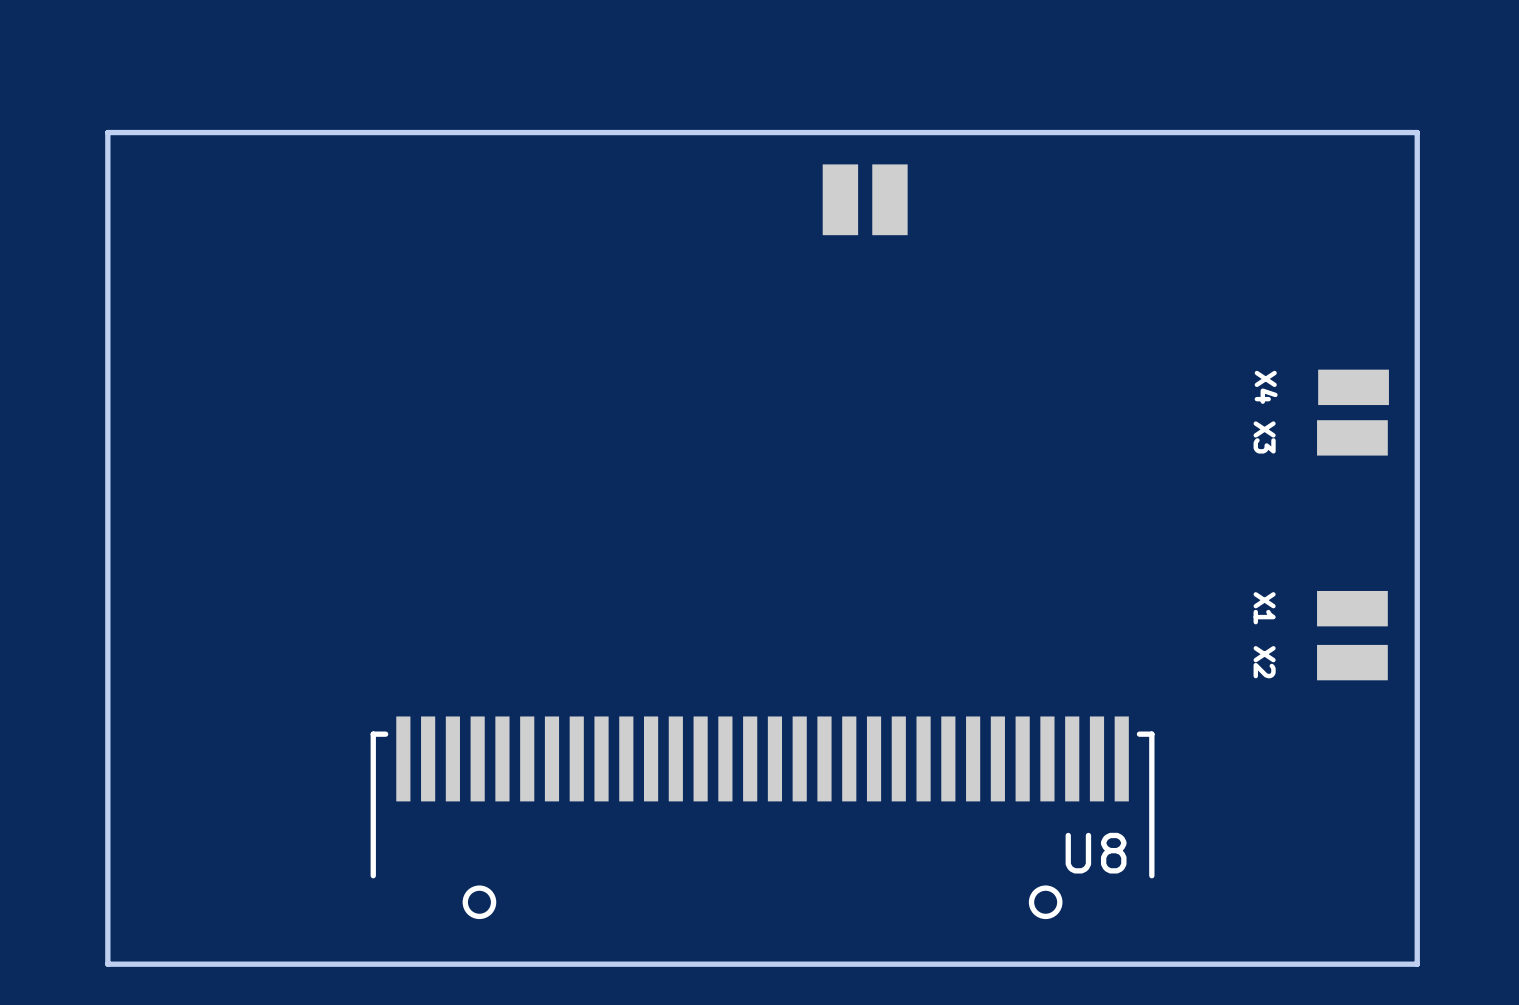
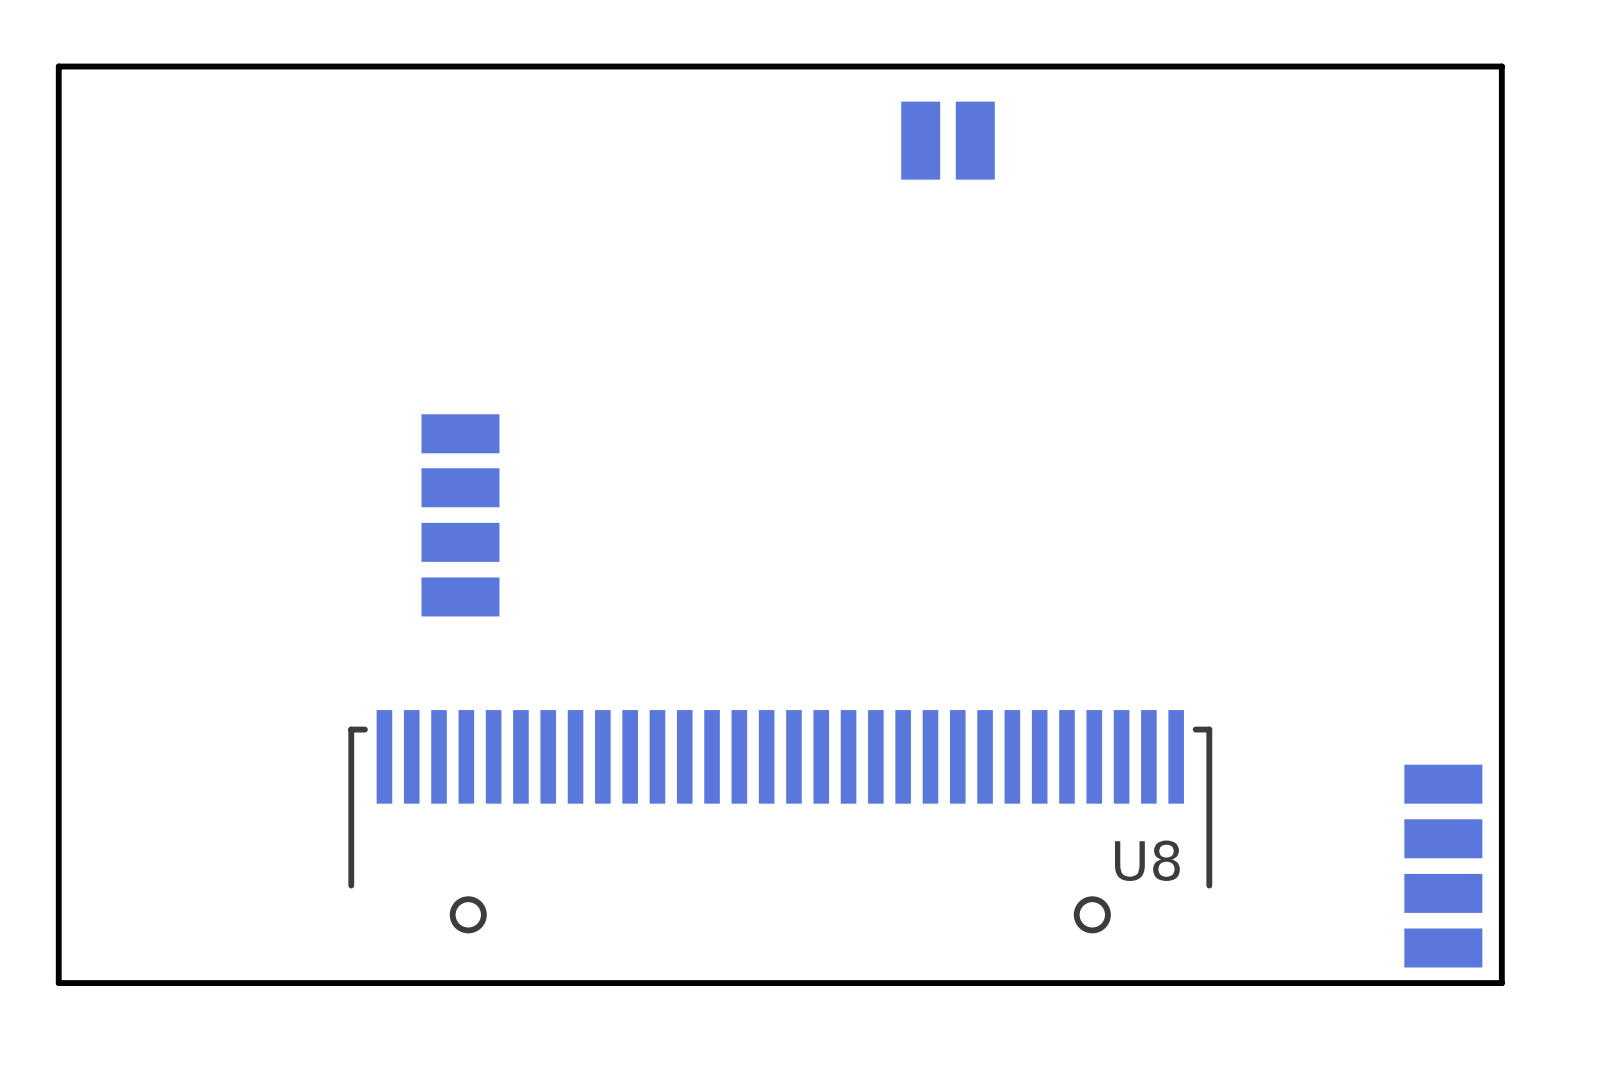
part position: (840, 199) -> (975, 140)
X4: (1353, 387) -> none
X3: (1352, 437) -> none
part: none -> (460, 433)
part: none -> (460, 487)
part: none -> (460, 542)
X1: (1352, 608) -> none
part: none -> (460, 596)
X2: (1352, 662) -> none
part: none -> (1443, 784)
part: none -> (1443, 838)
part: none -> (1443, 893)
part: none -> (1443, 947)

